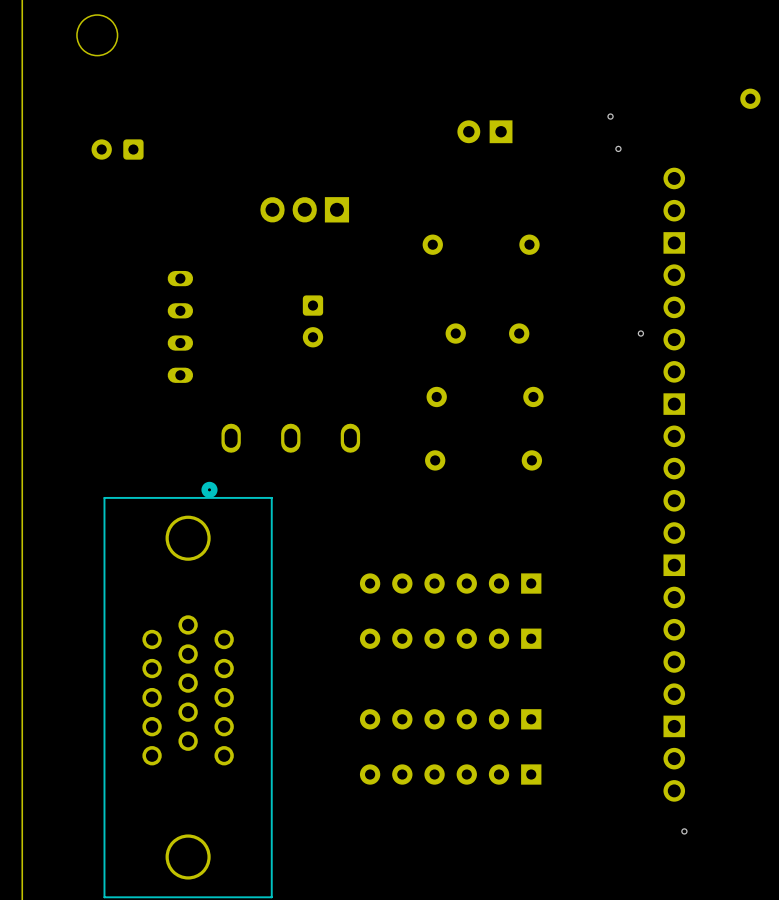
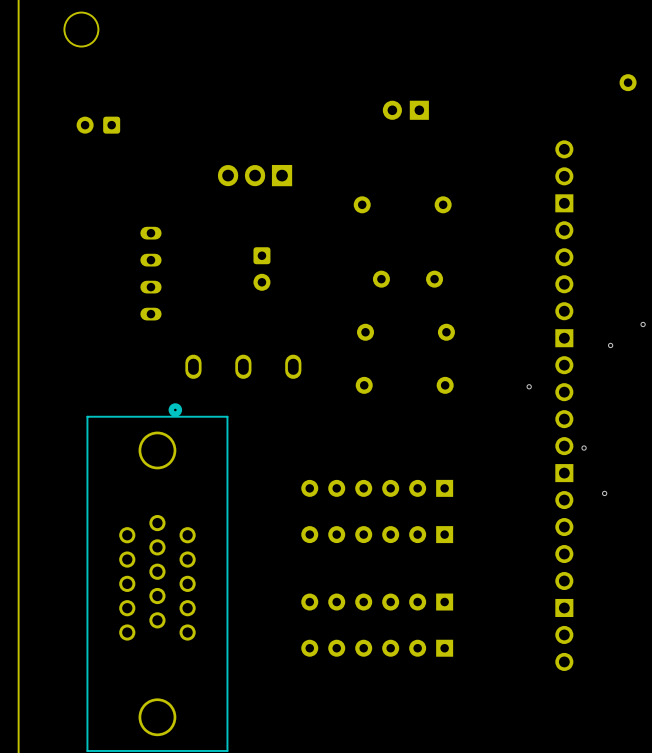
via: (610, 116) -> none
via: (618, 148) -> none
via: (640, 333) -> none
via: none -> (643, 324)
via: none -> (610, 345)
via: none -> (529, 386)
via: none -> (584, 448)
via: none -> (604, 493)
via: (684, 831) -> none

